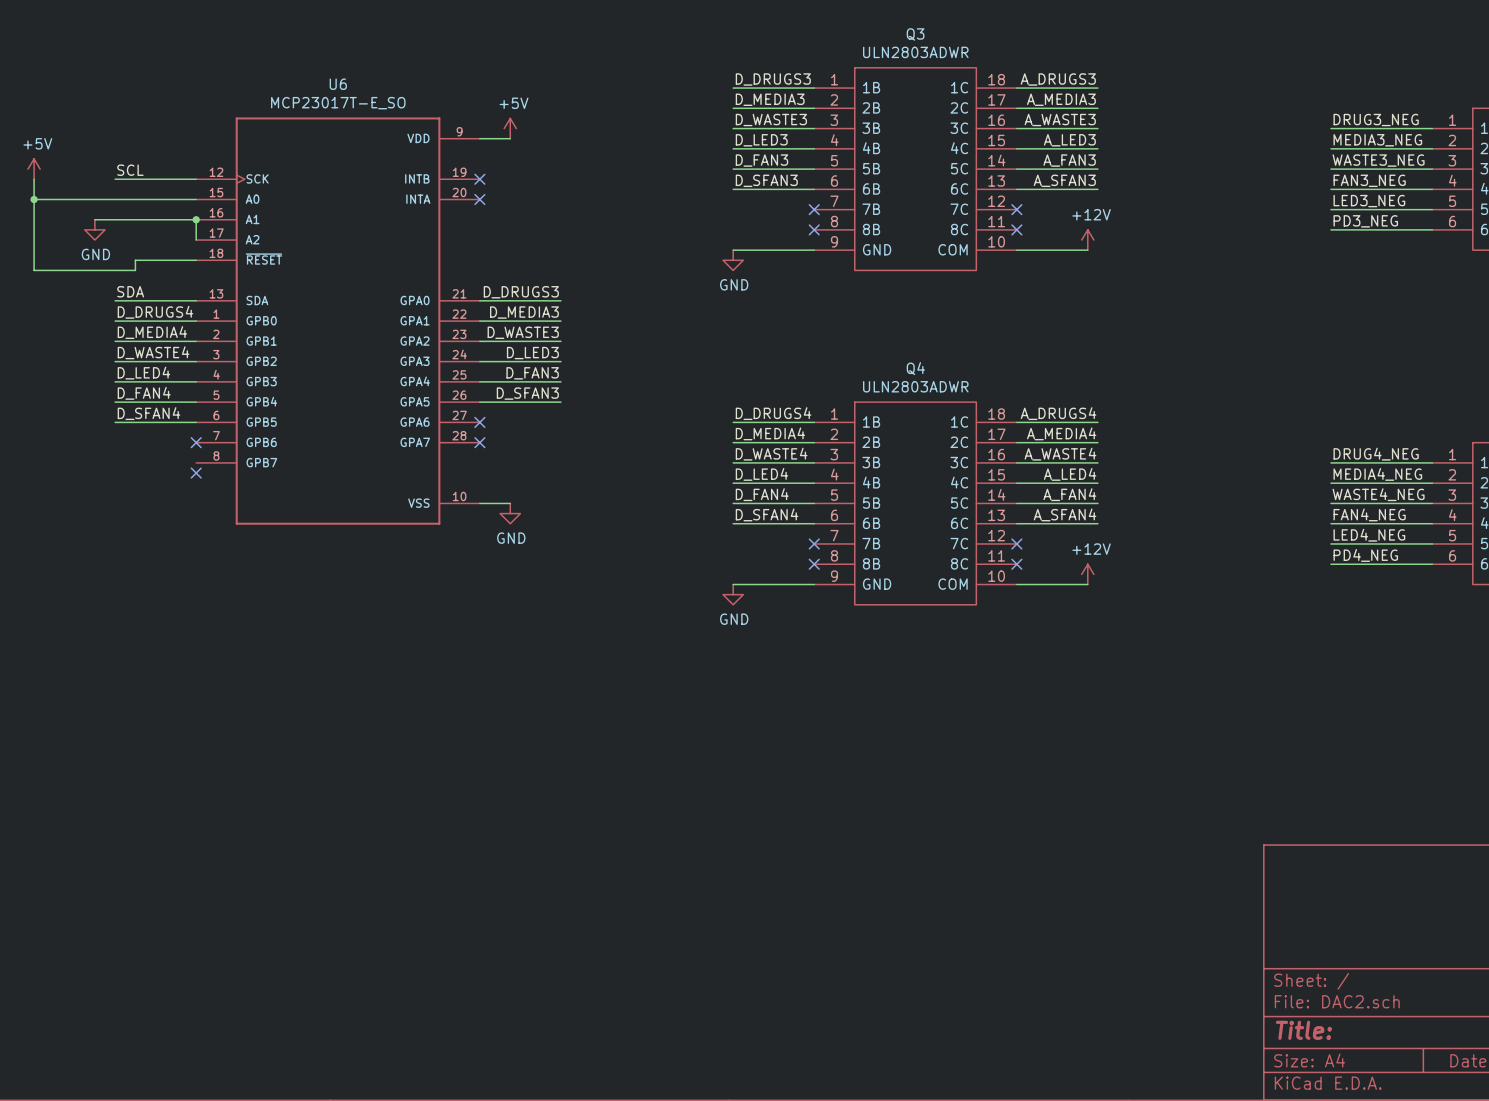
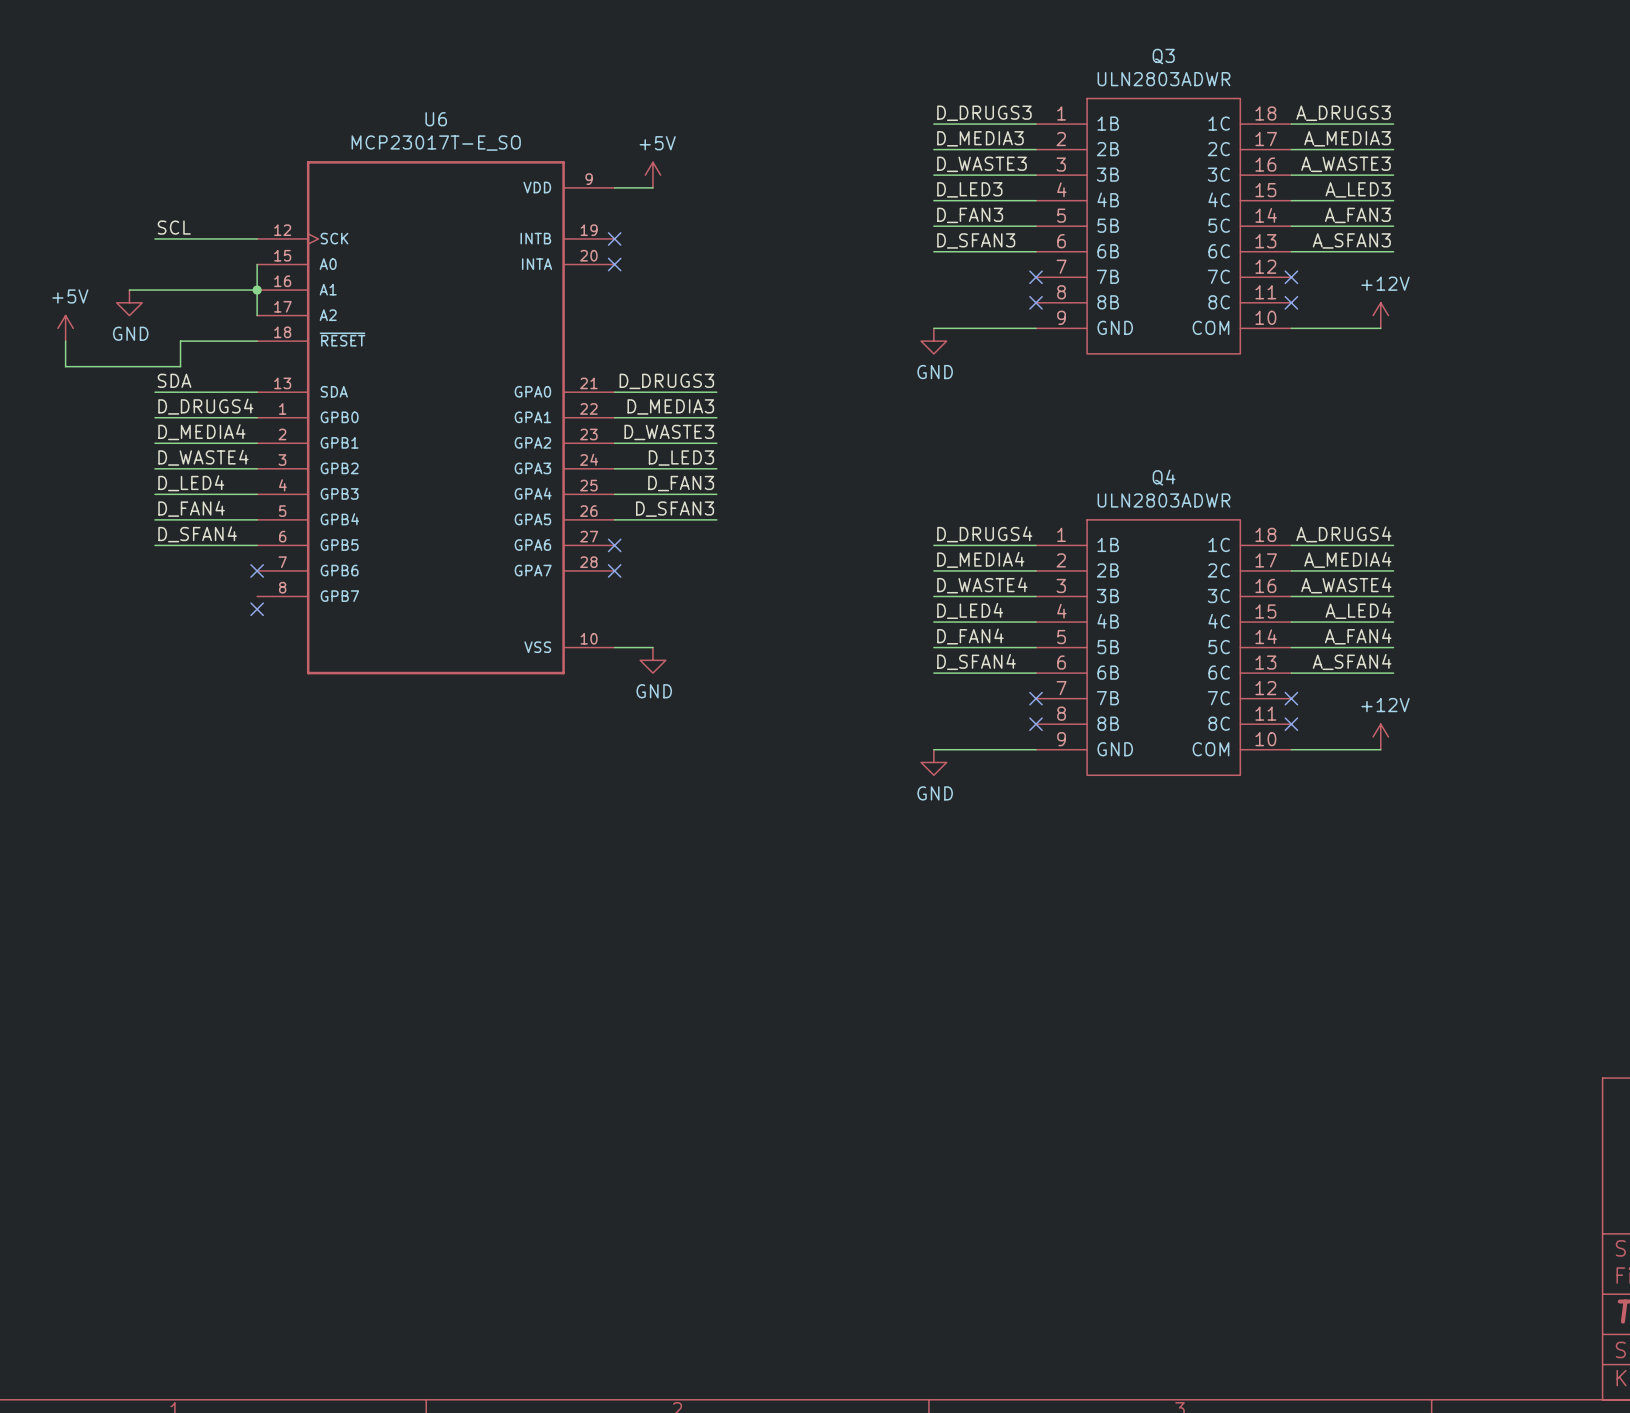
power symbol position: +5V (34, 169) -> +5V (65, 328)
wire: (34, 179) (34, 270) (135, 270) -> (65, 341) (65, 366) (180, 366) (180, 353)
wire: (34, 199) (196, 199) -> (257, 290) (257, 264)
junction: (34, 199) -> none

